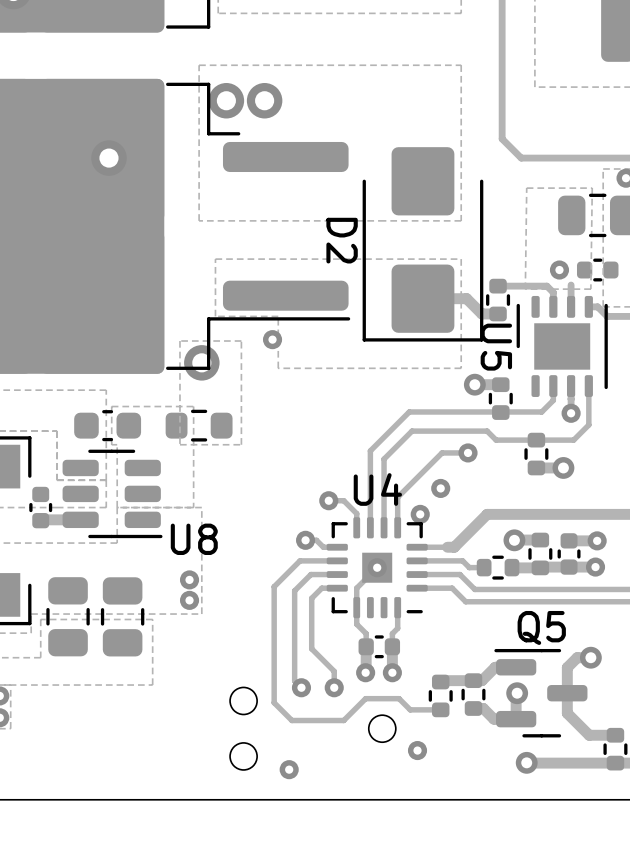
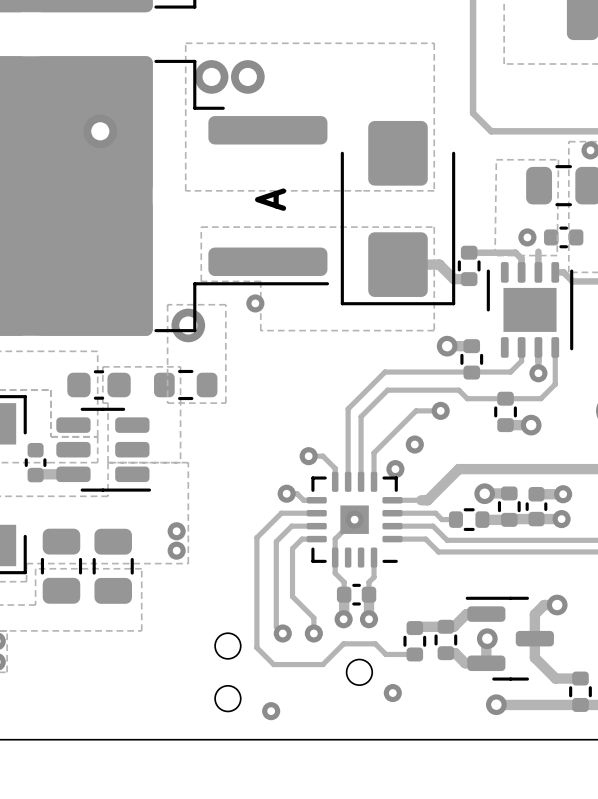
text: none -> A (270, 199)
D2 name: D2 (342, 240) -> none
U5 name: U5 (496, 347) -> none
U4 name: U4 (377, 489) -> none
U8 name: U8 (194, 539) -> none
Q5 name: Q5 (541, 627) -> none

